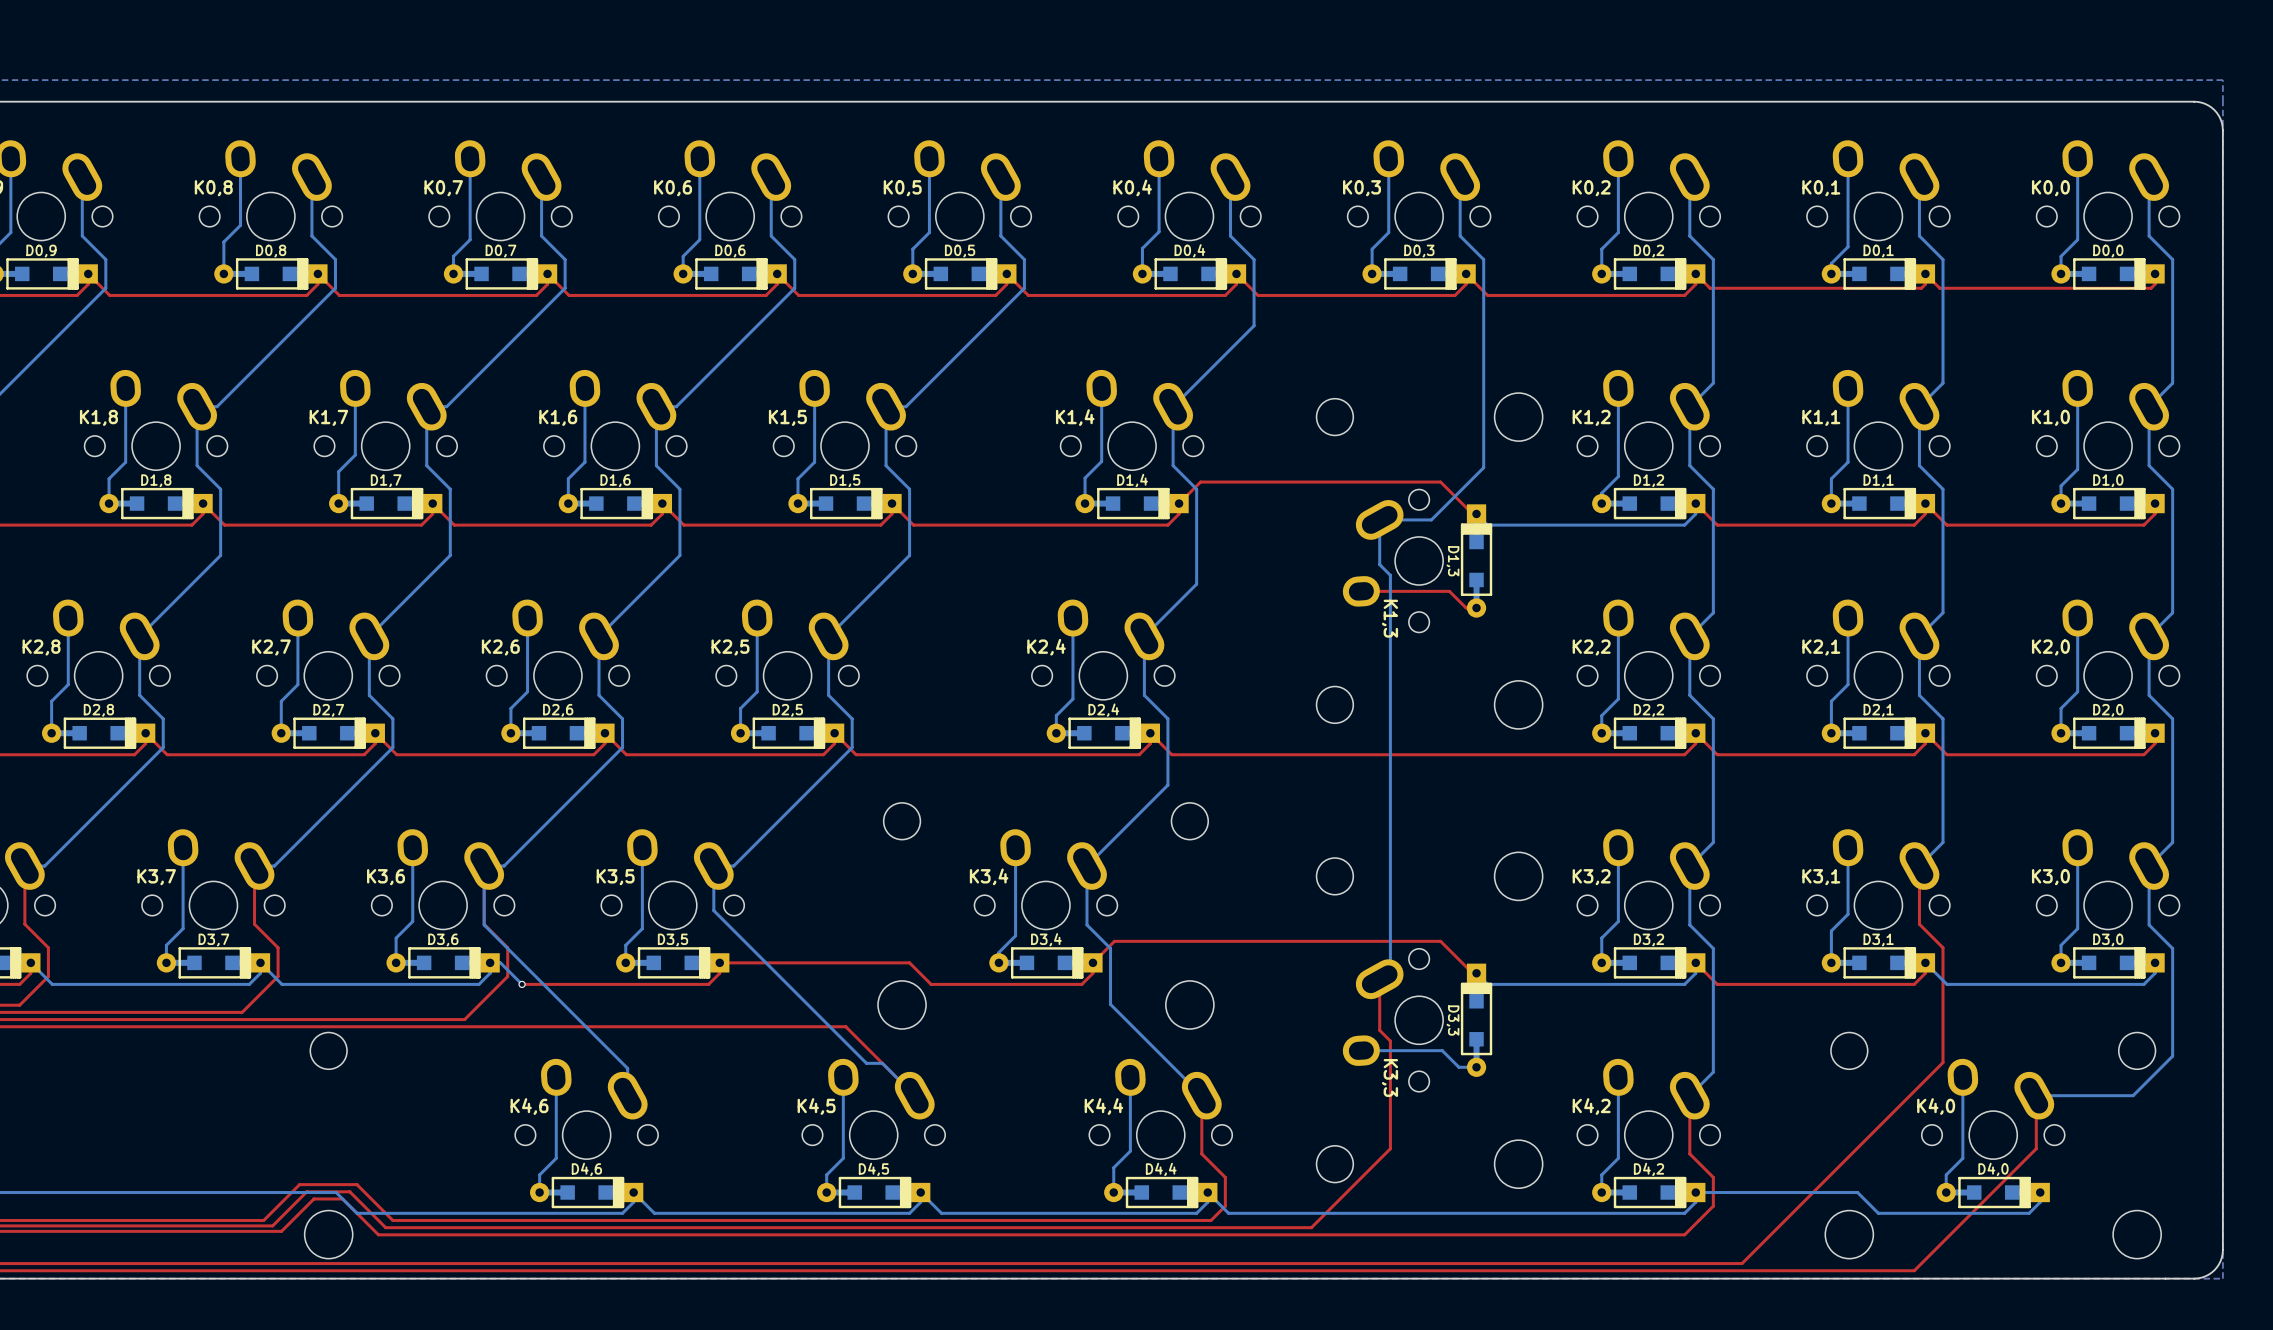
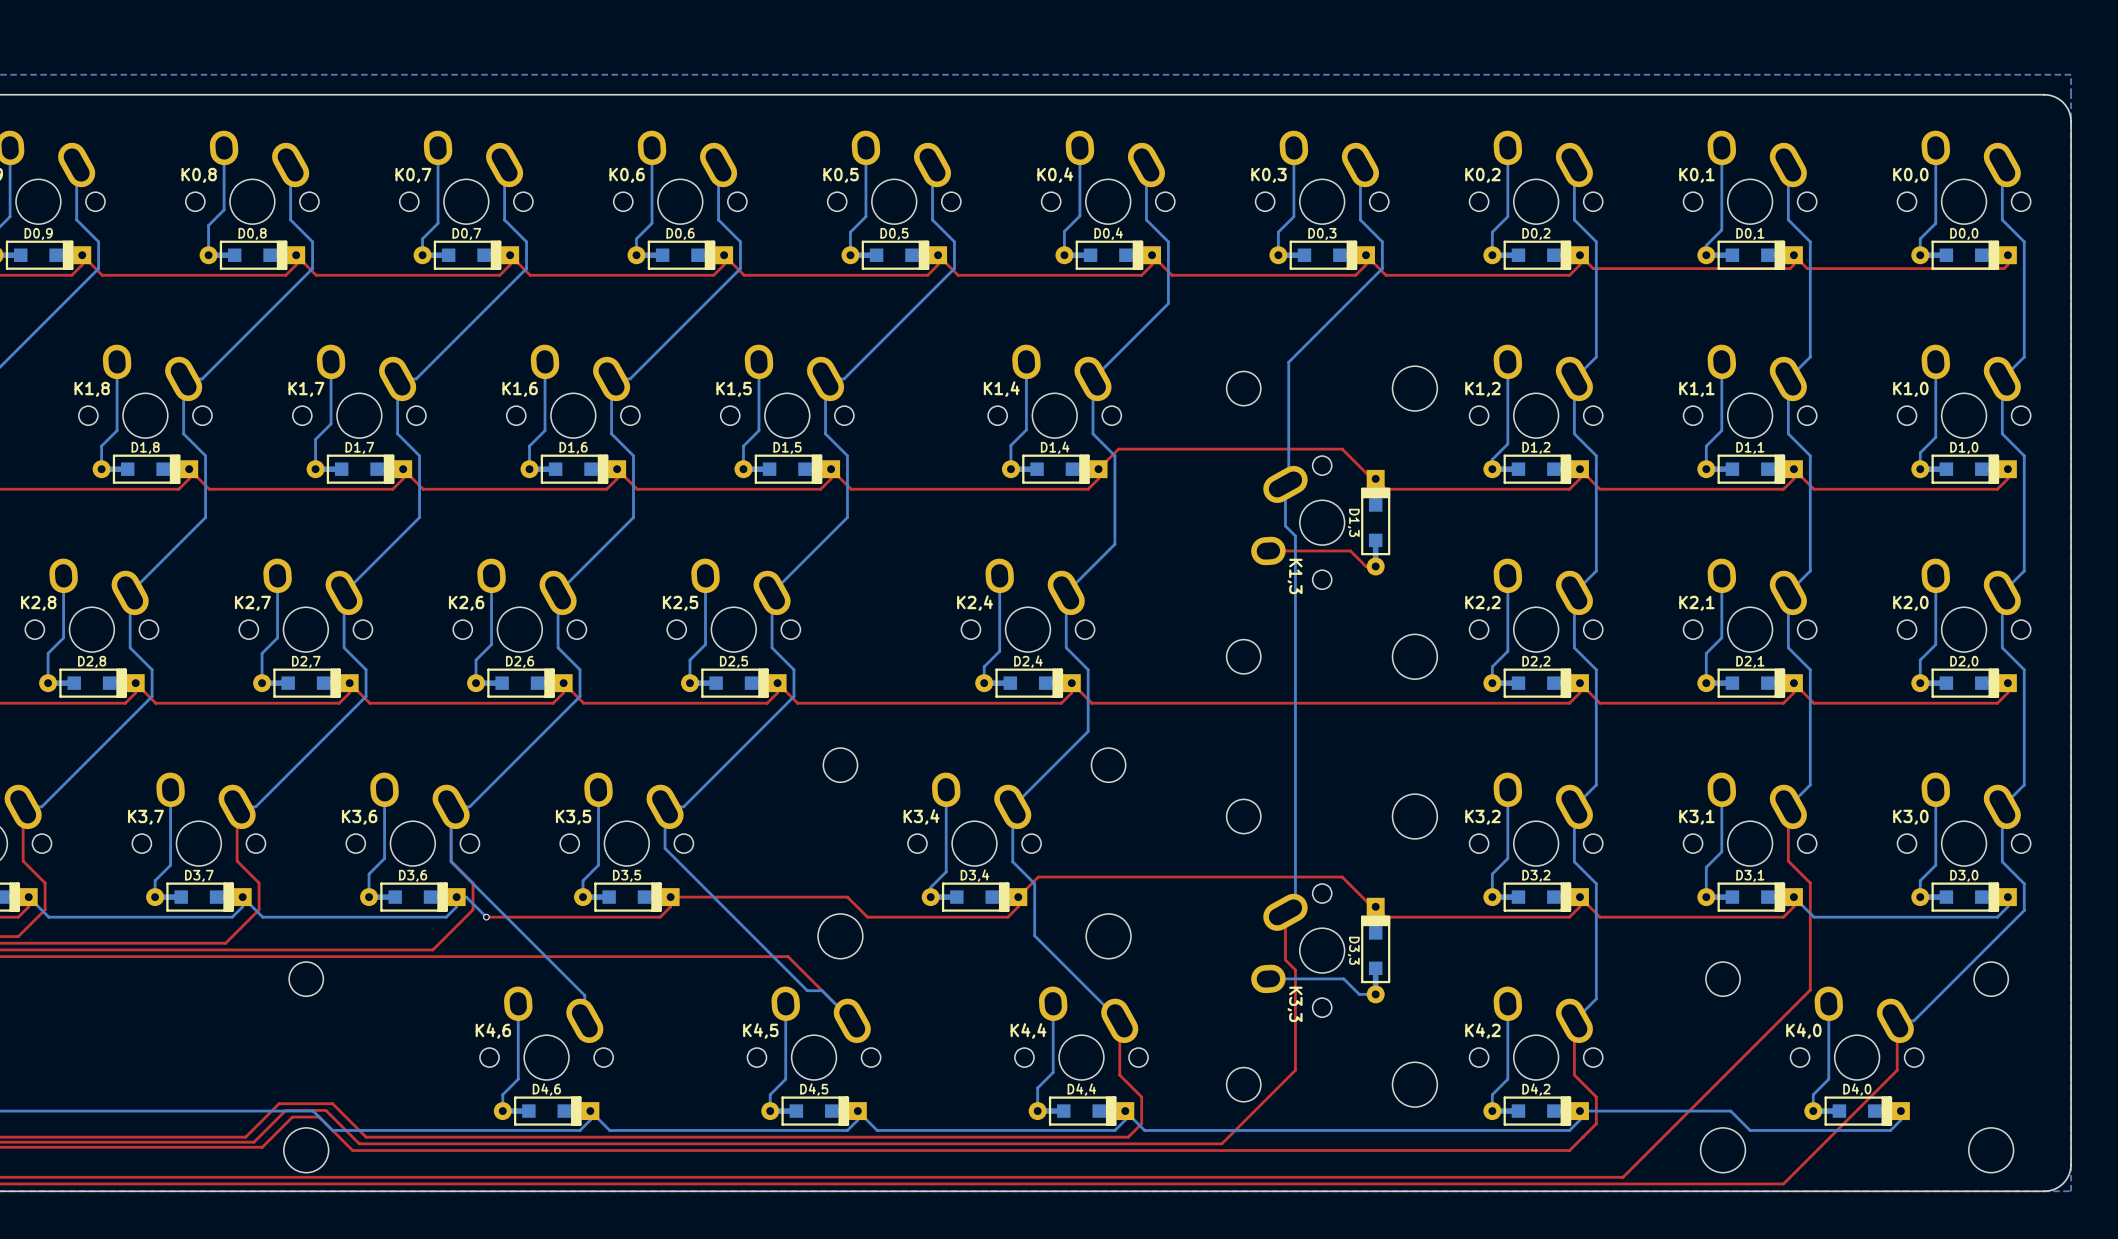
bottom track: (1483, 288) (1483, 467) (1431, 519) (1379, 519) -> (1382, 268) (1288, 362) (1288, 481) (1285, 484)
bottom track: (1695, 503) (1695, 513) (1684, 525) (1487, 525) (1476, 513) -> none
top track: none -> (1579, 469) (1579, 478) (1569, 489) (1386, 489) (1375, 478)
bottom track: (1695, 962) (1695, 973) (1684, 984) (1487, 984) (1476, 973) -> none
top track: none -> (1579, 897) (1579, 906) (1569, 917) (1386, 917) (1375, 906)
bottom track: (2172, 977) (2172, 1056) (2133, 1095) (2054, 1095) -> (2024, 910) (1913, 1020)

